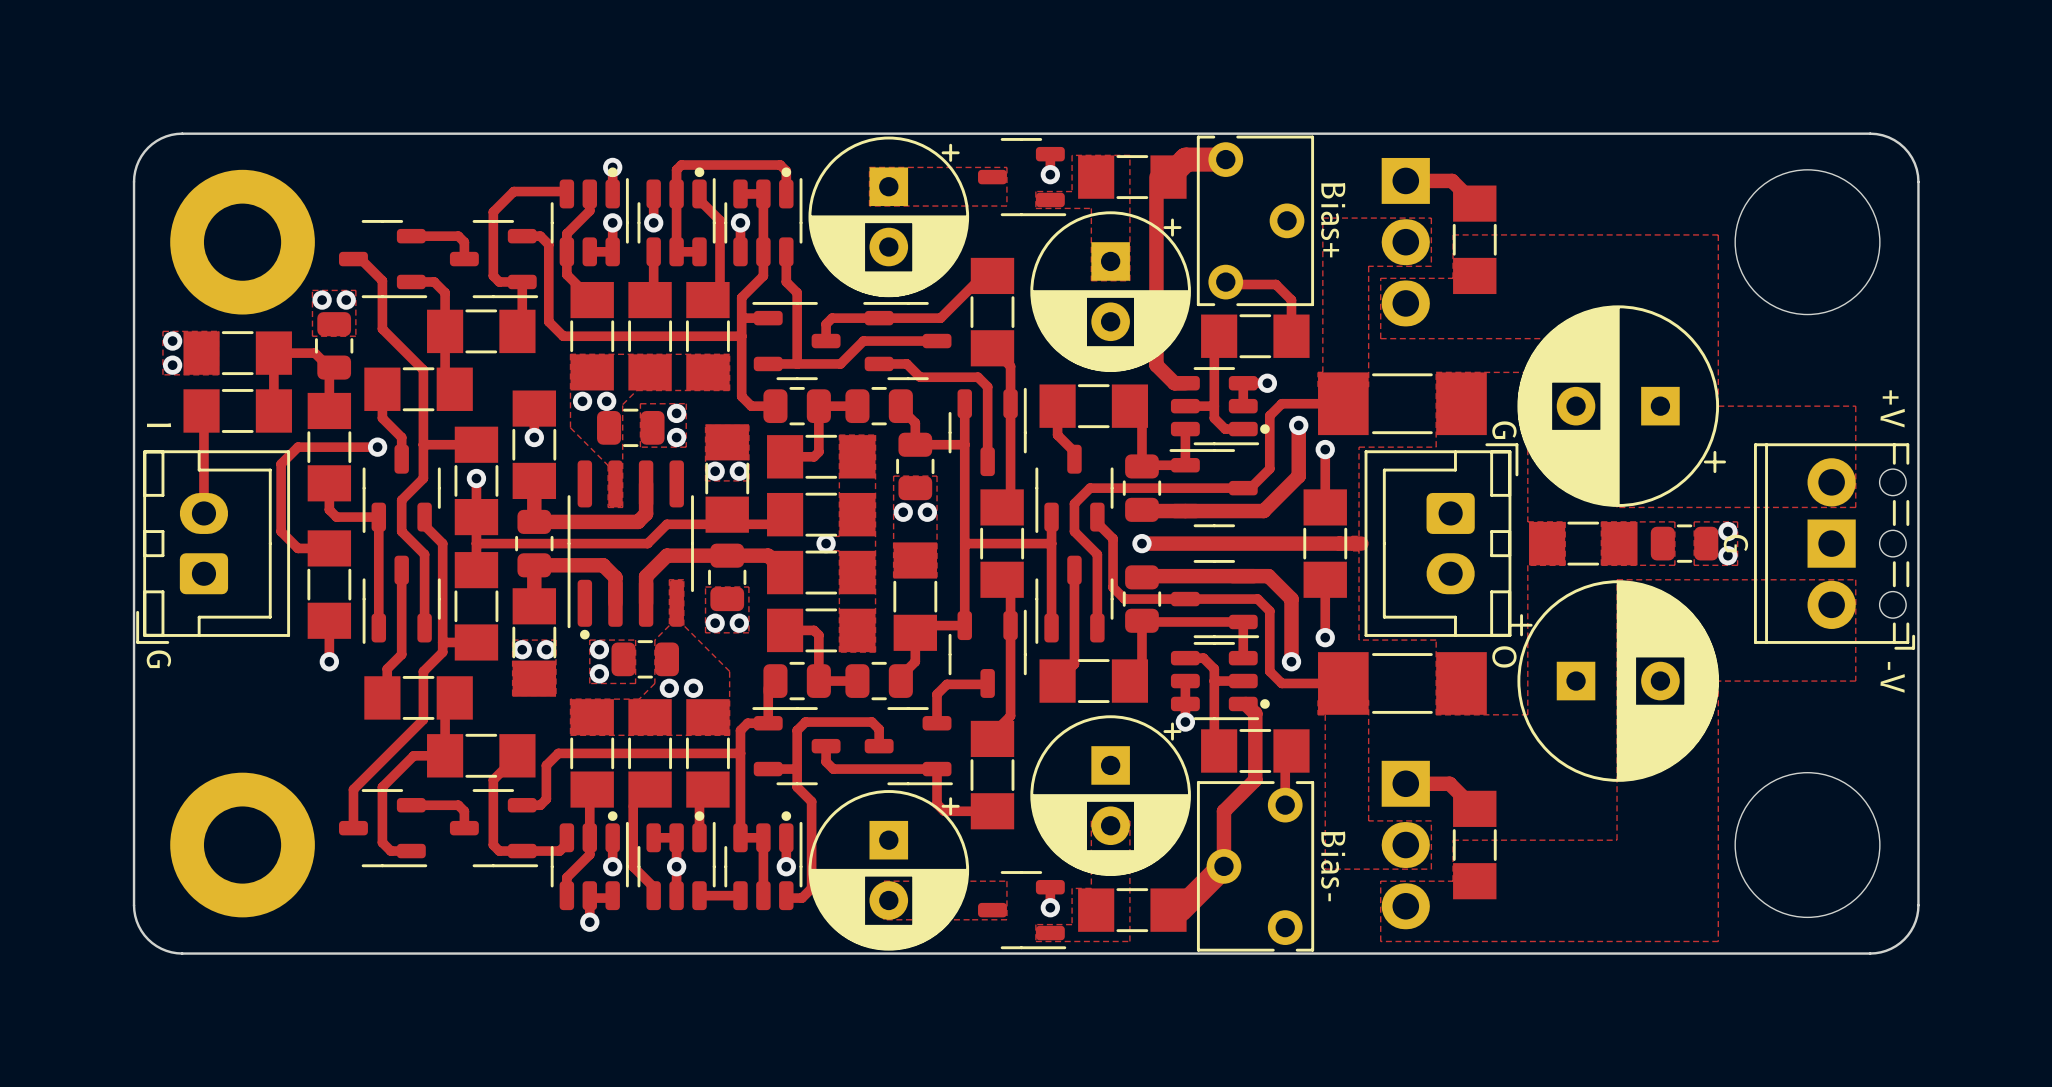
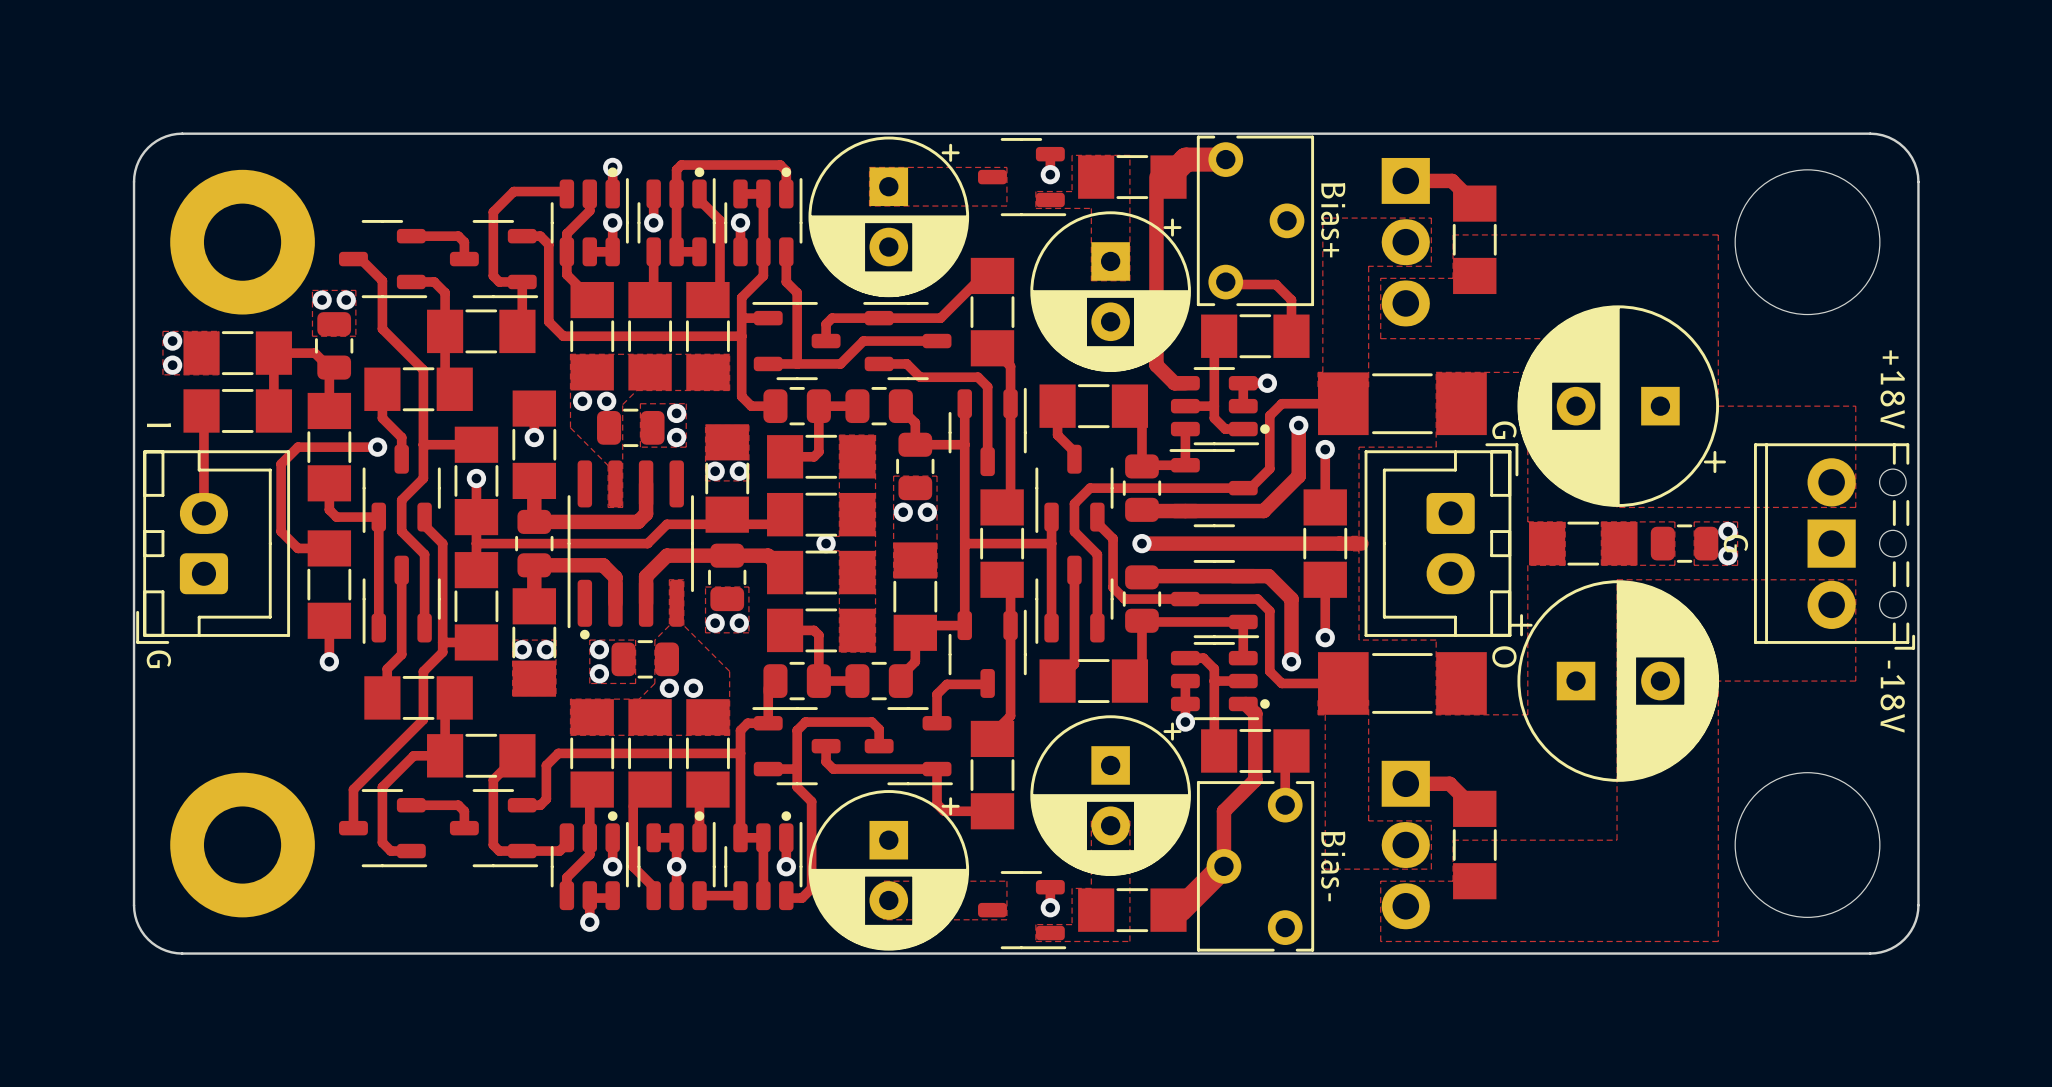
text: +V (1892, 408) -> +18V (1892, 389)
text: -V (1892, 677) -> -18V (1892, 696)

